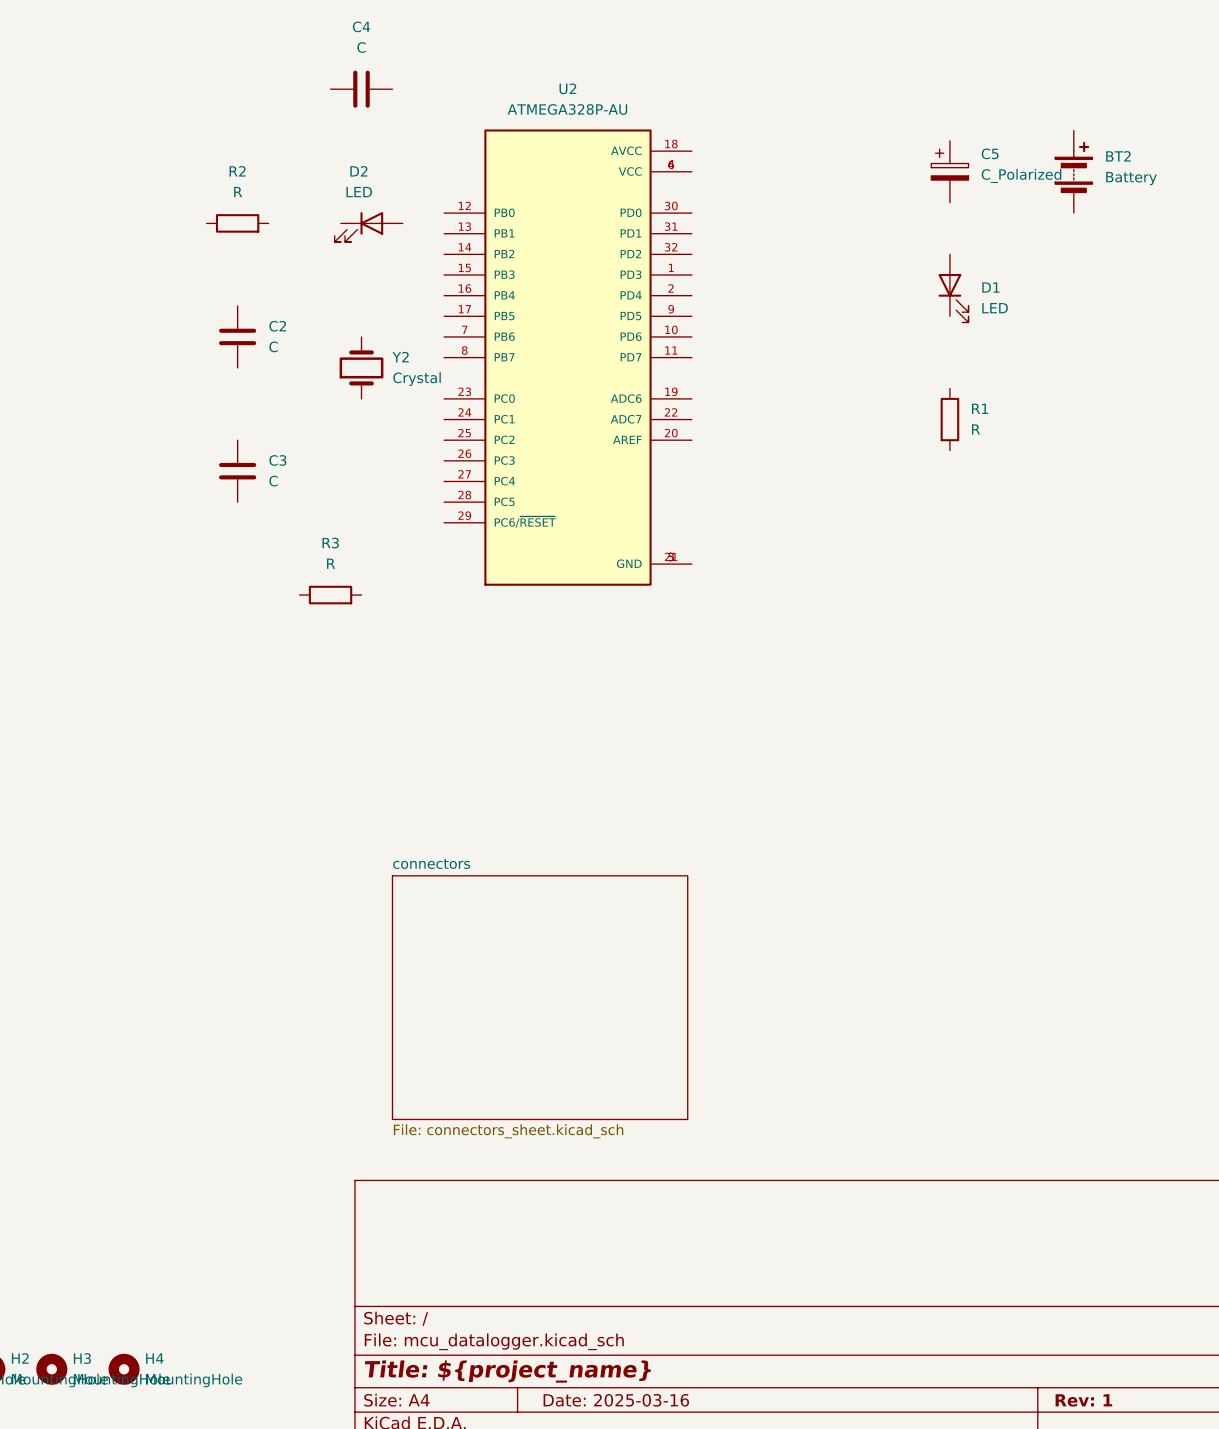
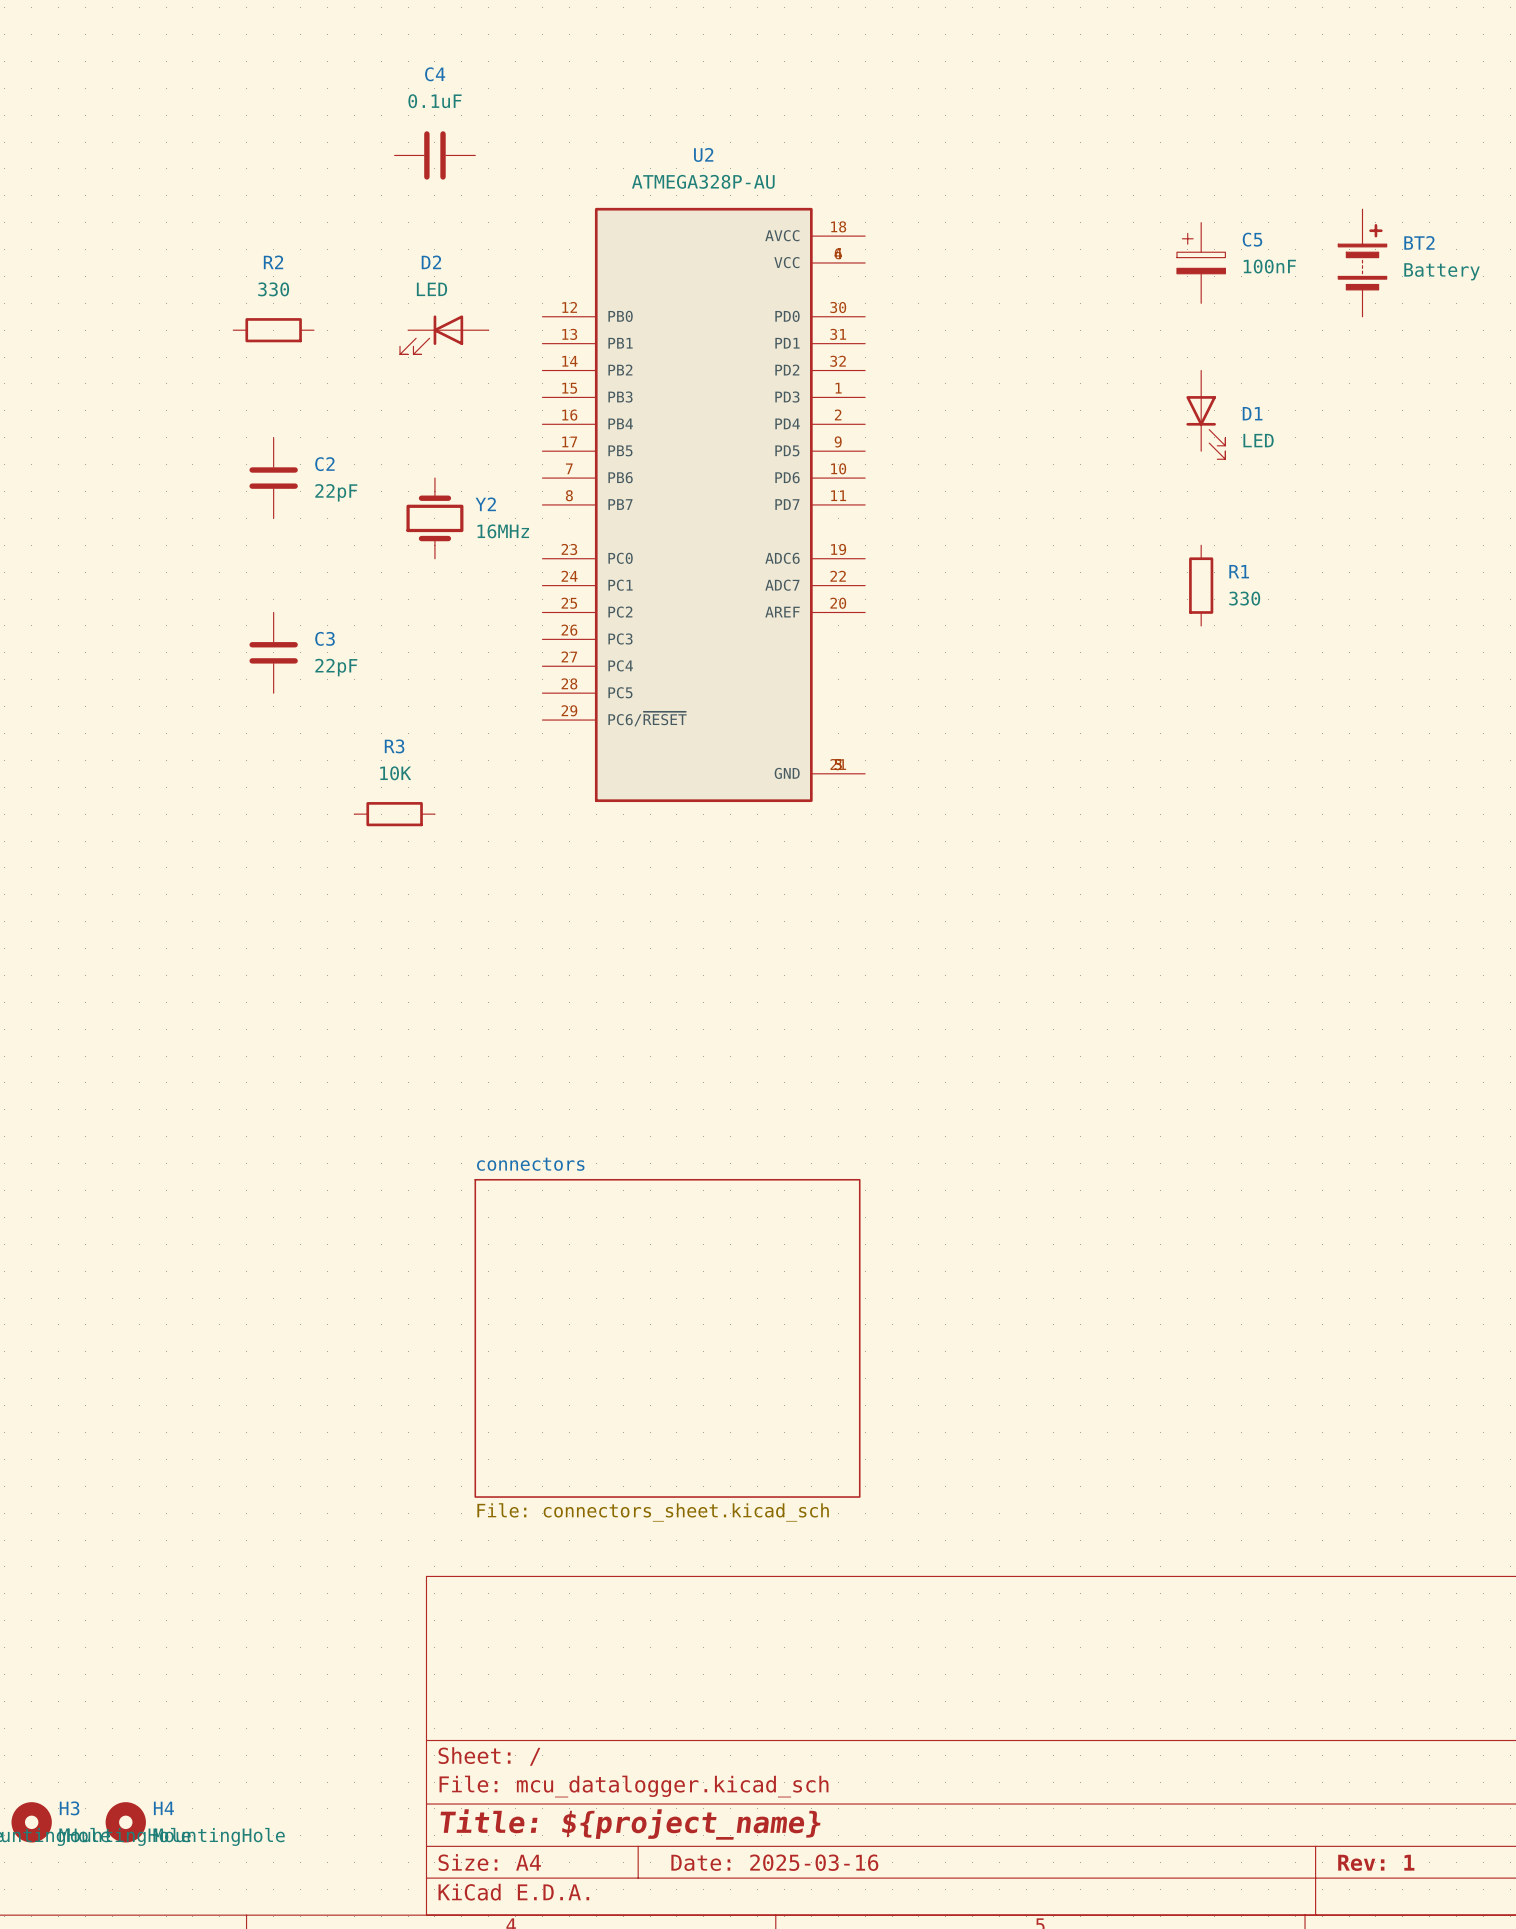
C4 value: C (361, 47) -> 0.1uF (435, 101)
C5 value: C_Polarized (1021, 175) -> 100nF (1269, 266)
R2 value: R (238, 192) -> 330 (273, 289)
C2 value: C (273, 346) -> 22pF (336, 492)
Y2 value: Crystal (417, 379) -> 16MHz (503, 531)
R1 value: R (975, 429) -> 330 (1244, 598)
C3 value: C (273, 481) -> 22pF (336, 667)
R3 value: R (331, 563) -> 10K (395, 773)

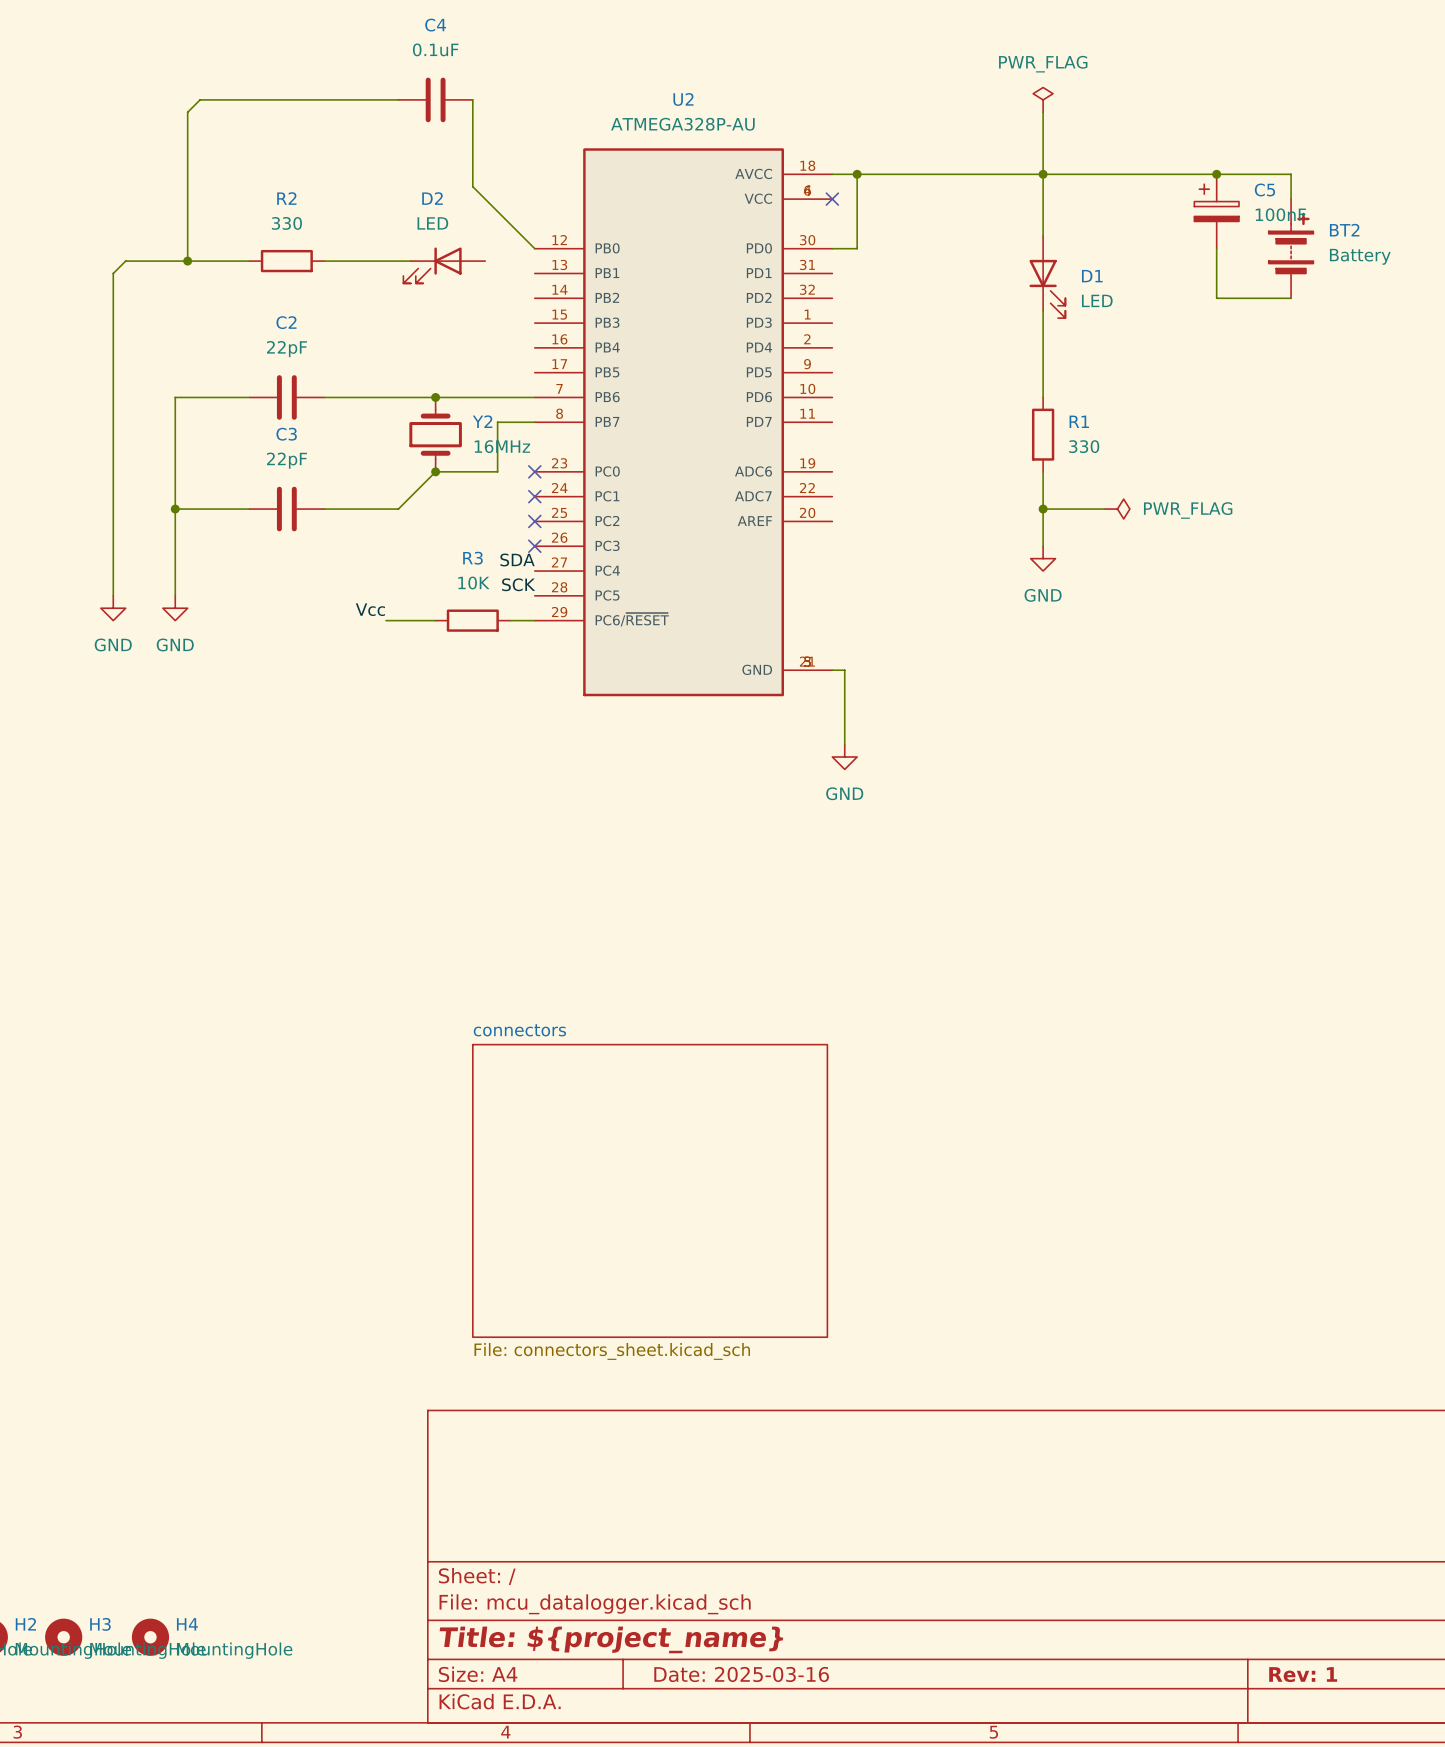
wire: none -> (398, 99) (200, 99) (187, 112) (187, 261)
wire: none -> (472, 99) (472, 186) (534, 248)
power symbol: none -> PWR_FLAG (1043, 99)
wire: none -> (1043, 112) (1043, 236)
wire: none -> (832, 174) (1291, 174) (1291, 199)
wire: none -> (857, 174) (857, 248) (832, 248)
junction: none -> (857, 174)
junction: none -> (1043, 174)
junction: none -> (1216, 174)
no-connect mark: none -> (832, 199)
C5 position: (1201, 262) -> (1216, 211)
BT2 position: (1362, 262) -> (1291, 248)
wire: none -> (1216, 248) (1216, 298) (1291, 298)
junction: none -> (187, 261)
wire: none -> (249, 261) (125, 261) (113, 273) (113, 595)
wire: none -> (324, 261) (410, 261)
wire: none -> (1043, 310) (1043, 397)
D1 position: (1205, 414) -> (1047, 277)
C2 name position: C2 (324, 464) -> C2 (286, 322)
wire: none -> (249, 397) (175, 397) (175, 595)
C2 rotation: 0° (273, 478) -> 90° clockwise (286, 397)
wire: none -> (324, 397) (534, 397)
junction: none -> (435, 397)
C2 value position: 22pF (336, 492) -> 22pF (286, 349)
wire: none -> (534, 422) (497, 422) (497, 471) (435, 471) (398, 509) (324, 509)
junction: none -> (435, 471)
no-connect mark: none -> (534, 471)
wire: none -> (1043, 471) (1043, 546)
no-connect mark: none -> (534, 496)
R1 position: (1201, 585) -> (1043, 434)
wire: none -> (175, 509) (249, 509)
junction: none -> (175, 509)
wire: none -> (1043, 509) (1105, 509)
junction: none -> (1043, 509)
power symbol: none -> PWR_FLAG (1117, 509)
no-connect mark: none -> (534, 521)
C3 name position: C3 (325, 638) -> C3 (286, 434)
no-connect mark: none -> (534, 546)
C3 rotation: 0° (273, 652) -> 90° clockwise (286, 509)
C3 position: (273, 652) -> (286, 509)
power symbol: none -> GND (1043, 558)
label: none -> SDA (517, 559)
C3 value position: 22pF (336, 667) -> 22pF (286, 460)
label: none -> SCK (518, 584)
power symbol: none -> GND (113, 608)
power symbol: none -> GND (175, 608)
label: none -> Vcc (370, 609)
wire: none -> (386, 620) (435, 620)
wire: none -> (510, 620) (534, 620)
wire: none -> (832, 670) (844, 670) (844, 744)
R3 position: (394, 814) -> (472, 620)
power symbol: none -> GND (844, 757)

